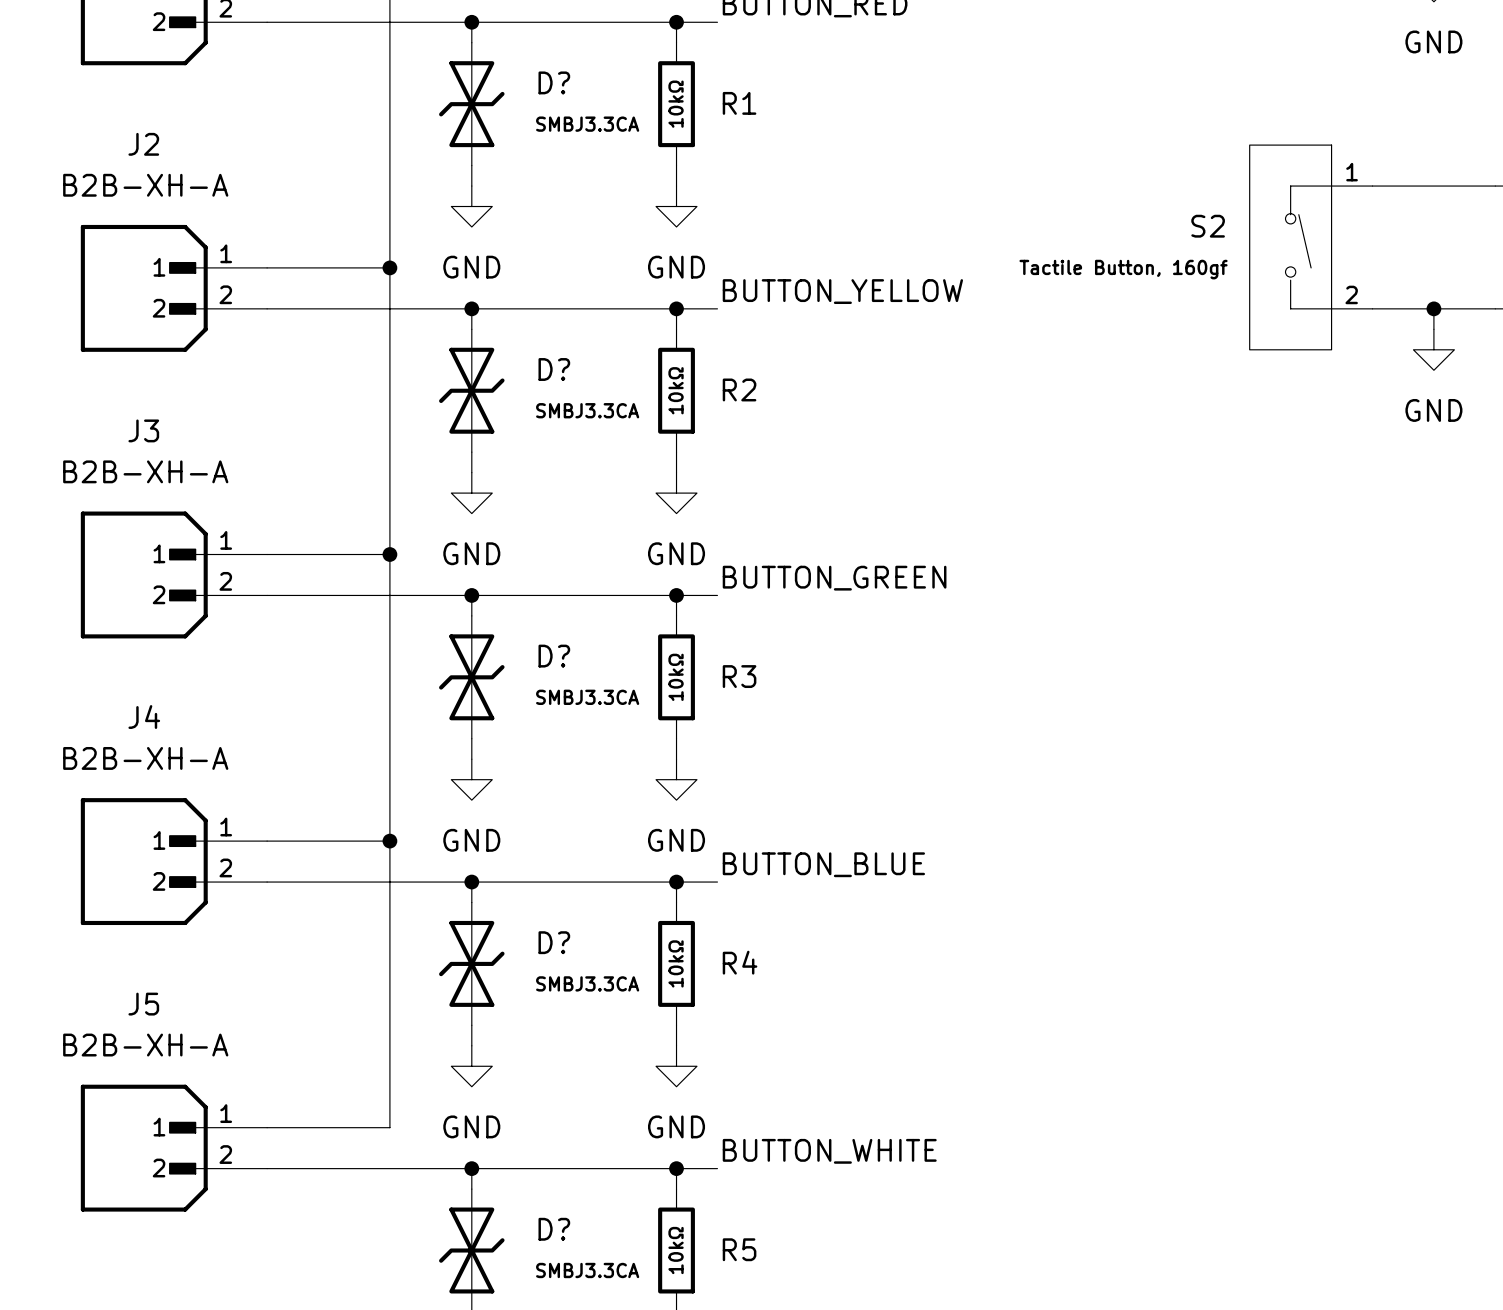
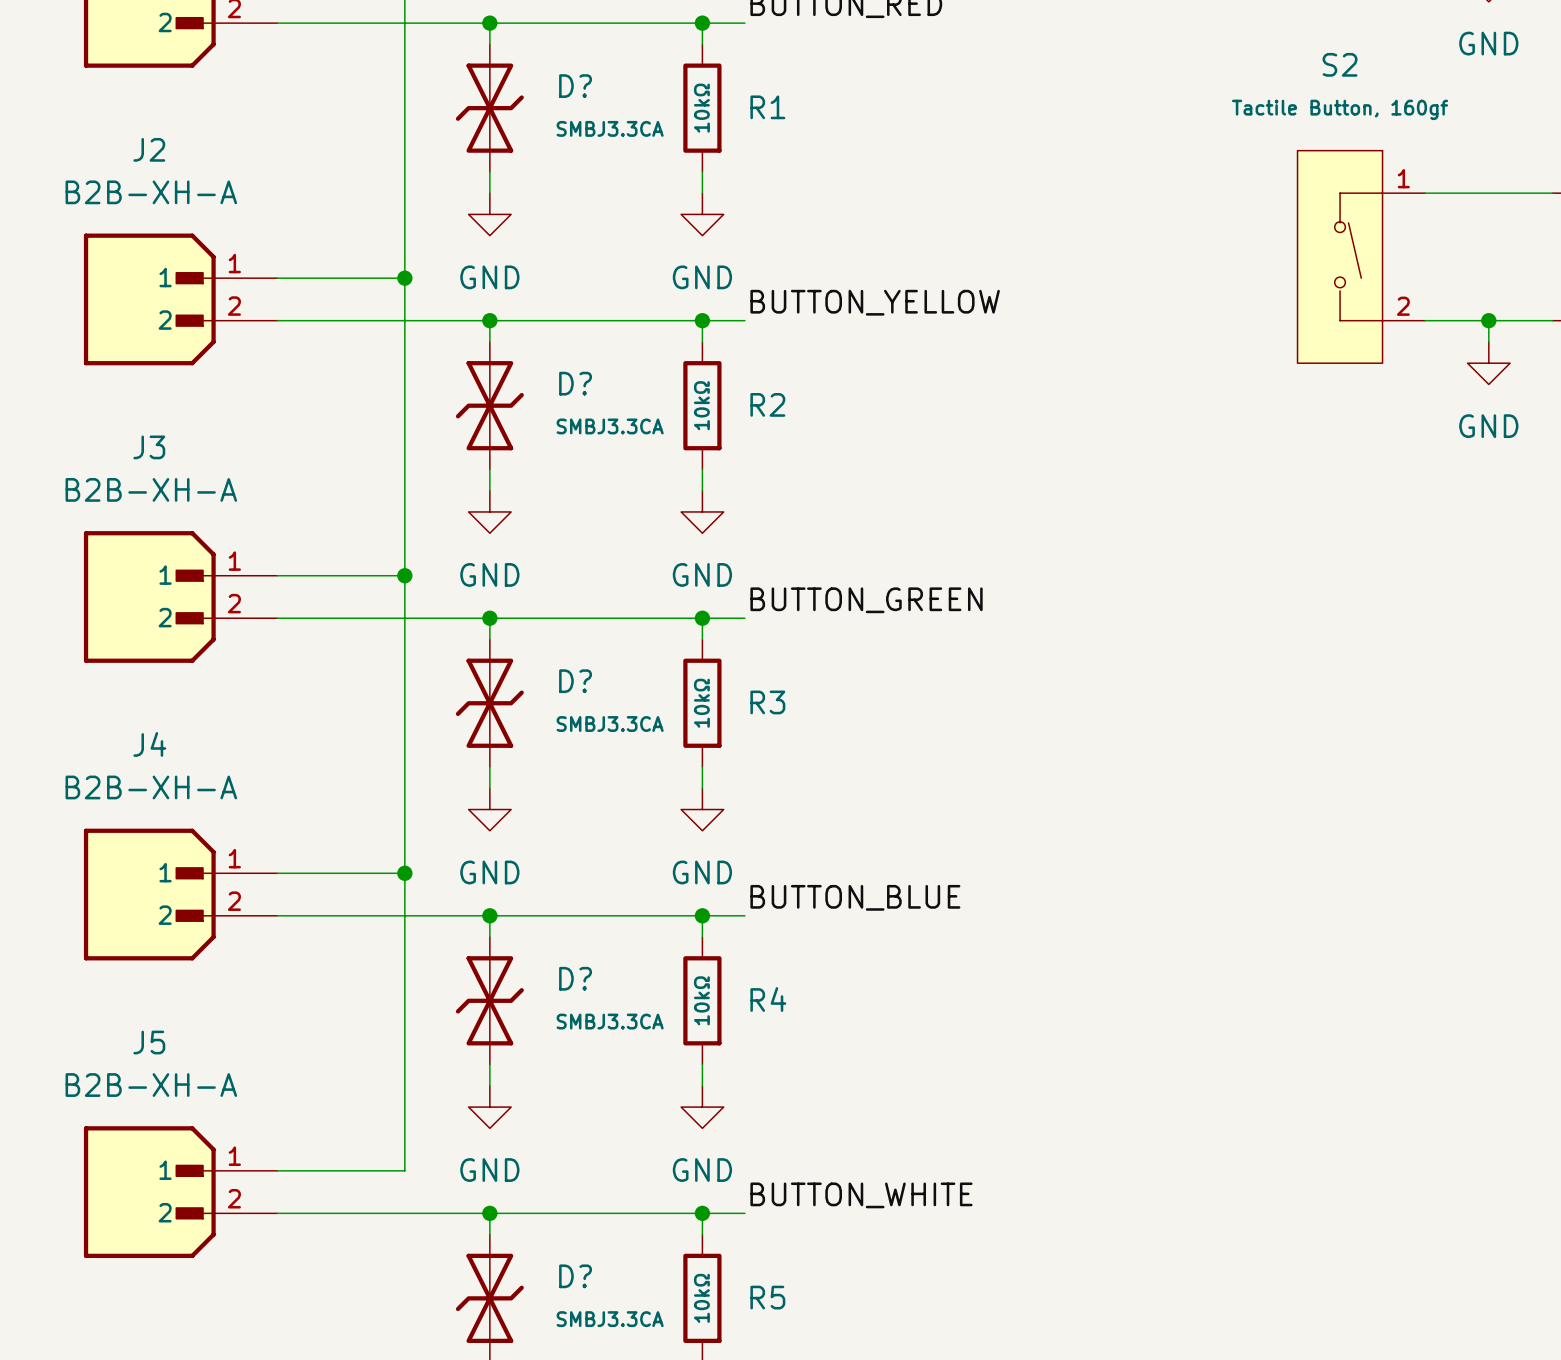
S2 name position: S2 (1208, 226) -> S2 (1340, 64)
S2 value position: Tactile Button, 160gf (1123, 269) -> Tactile Button, 160gf (1340, 109)

